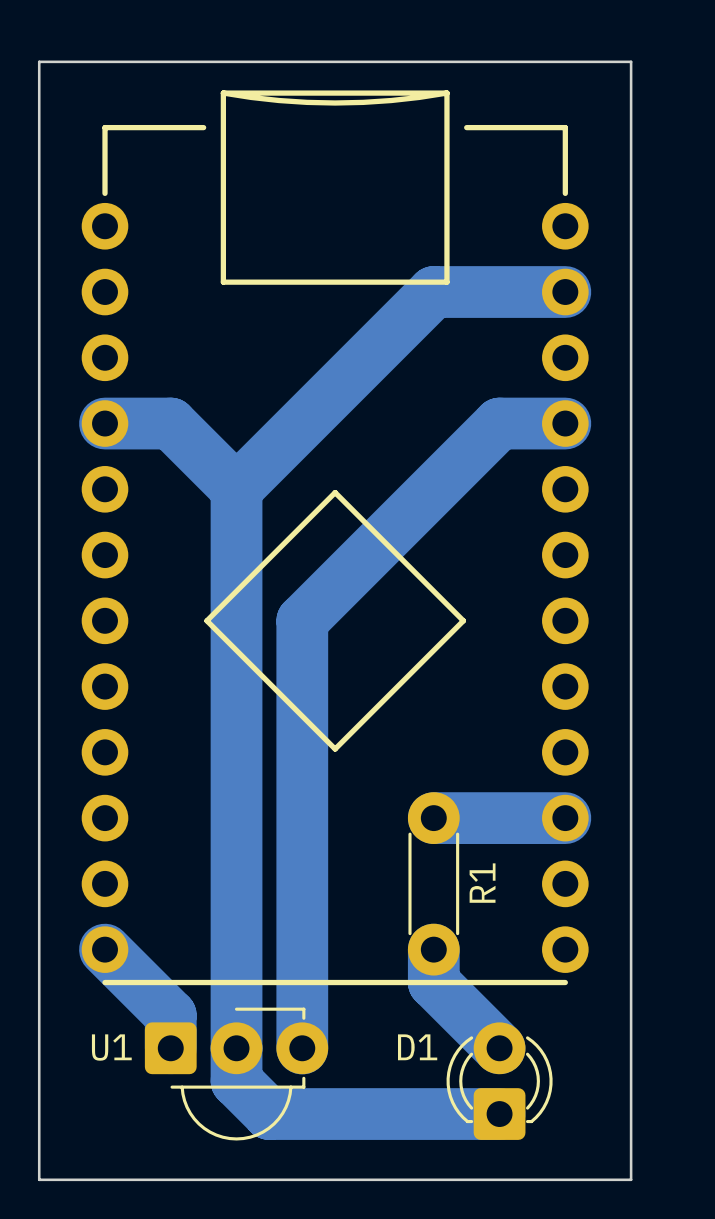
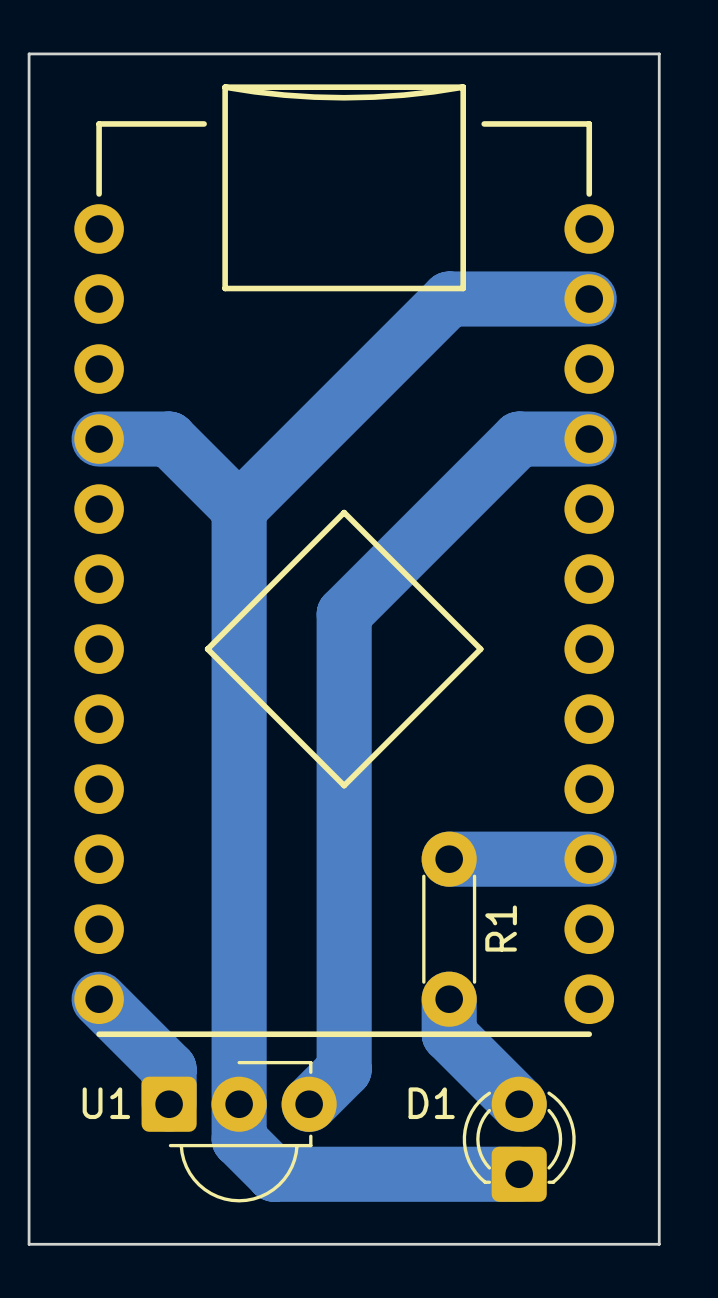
bottom track: (335, 587) (302, 620) (302, 1048) -> (344, 614) (344, 1069) (309, 1104)

